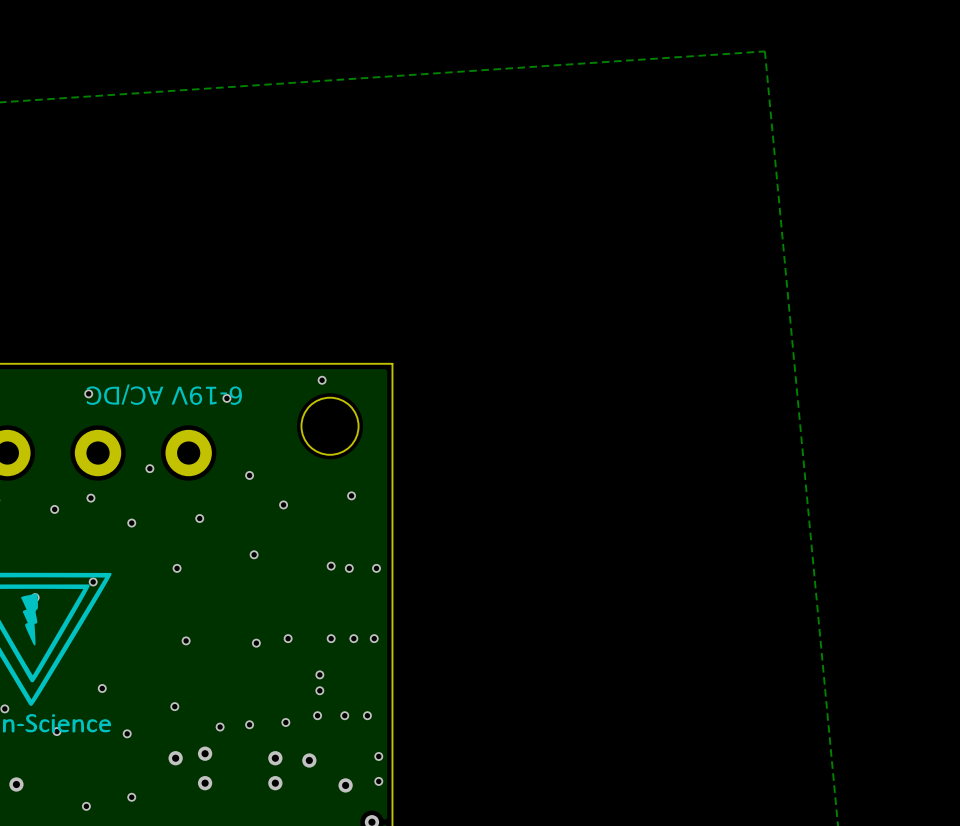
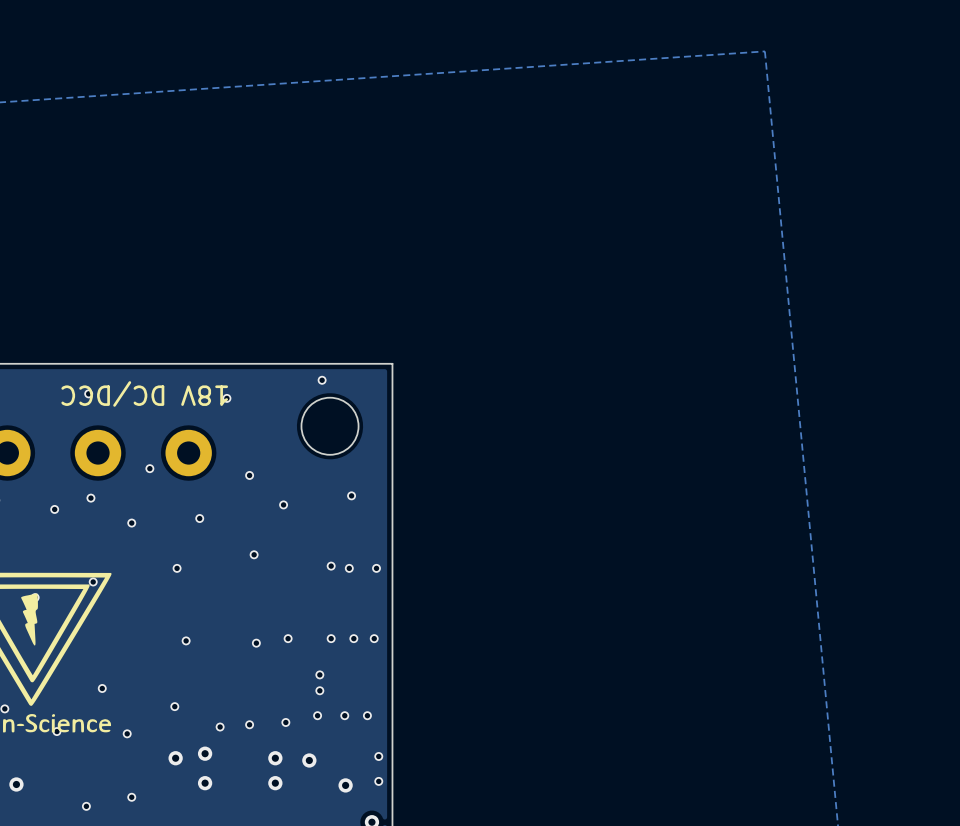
text: 6-19V AC/DC (164, 394) -> 18V DC/DCC (144, 393)

